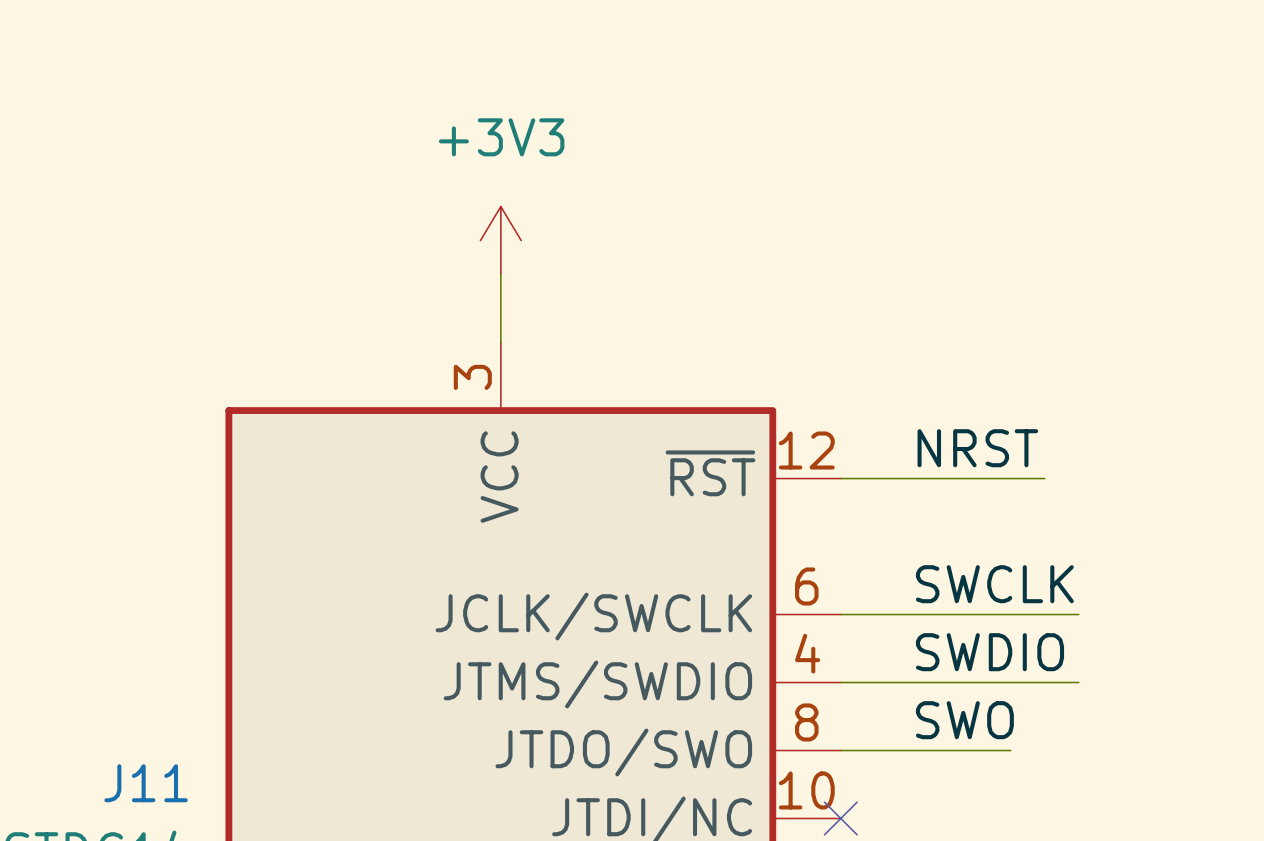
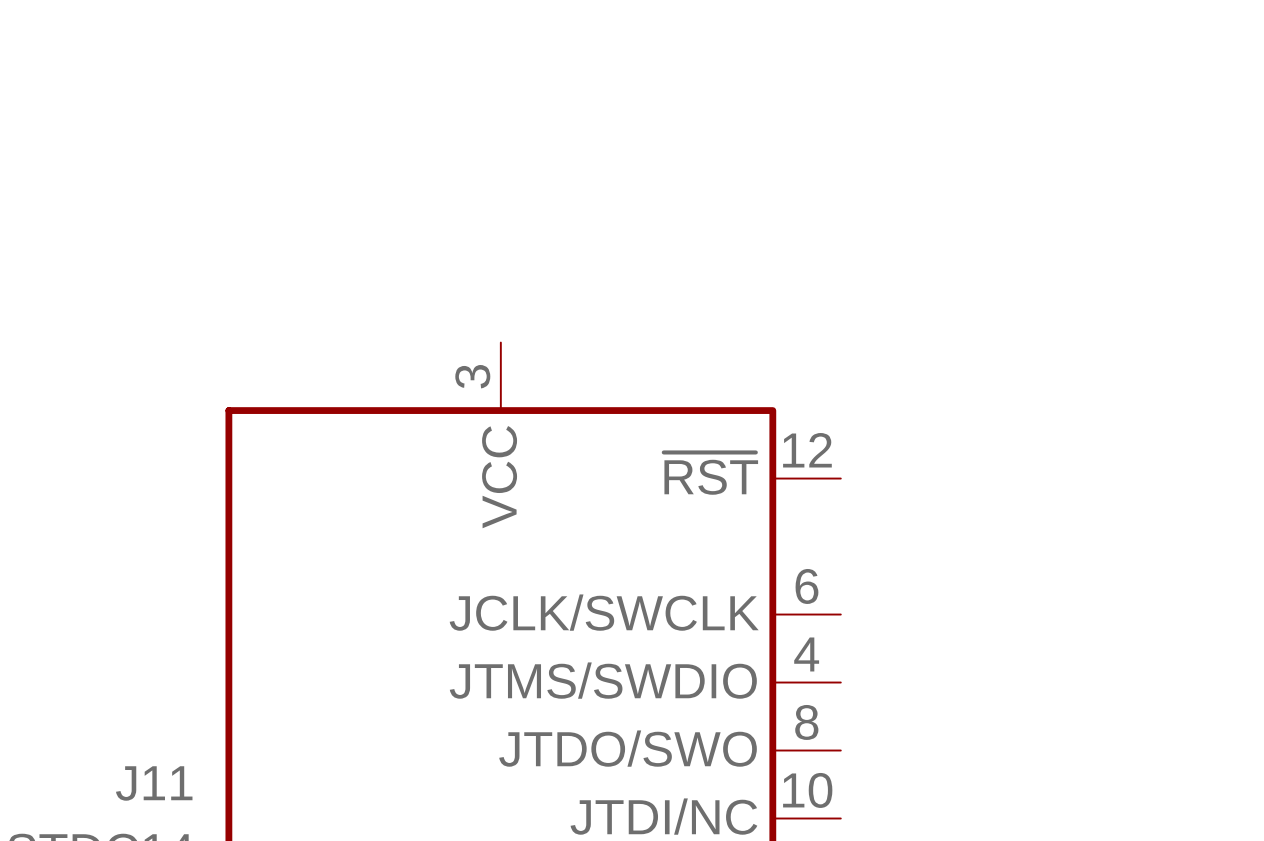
power symbol: +3V3 (500, 240) -> none
wire: (500, 274) (500, 342) -> none
label: NRST (977, 448) -> none
wire: (840, 478) (1044, 478) -> none
label: SWCLK (994, 584) -> none
wire: (840, 614) (1078, 614) -> none
label: SWDIO (989, 652) -> none
wire: (840, 682) (1078, 682) -> none
label: SWO (964, 720) -> none
wire: (840, 750) (1010, 750) -> none
no-connect mark: (840, 818) -> none

